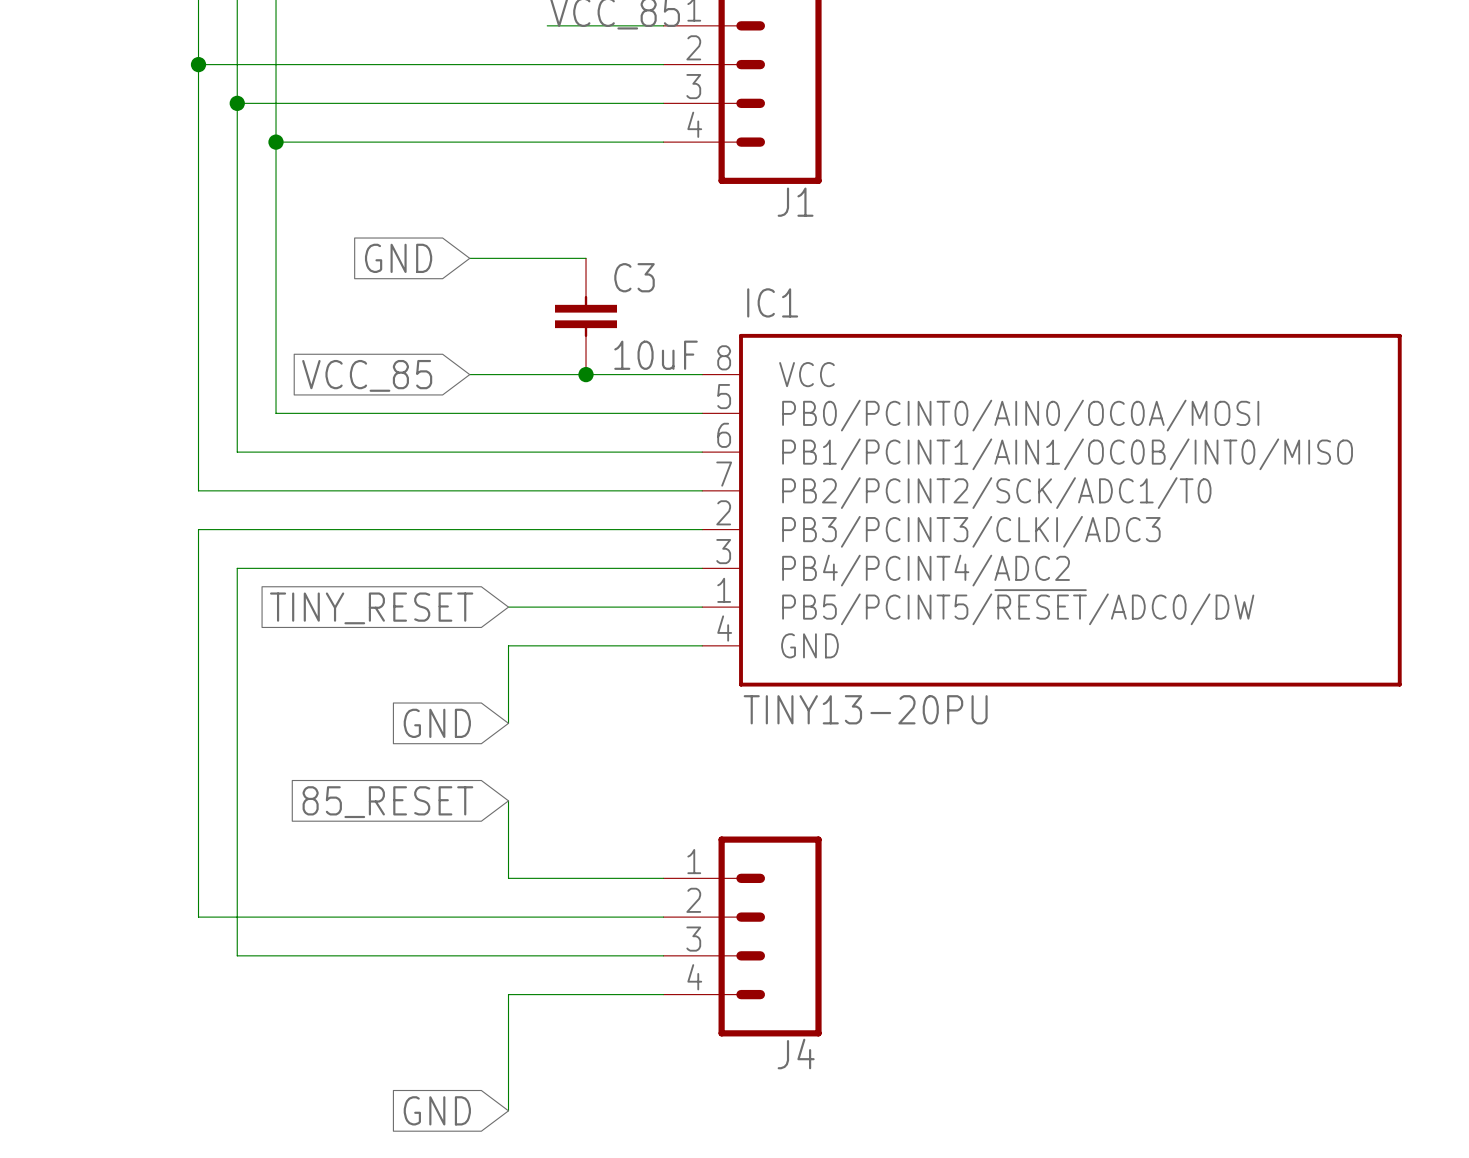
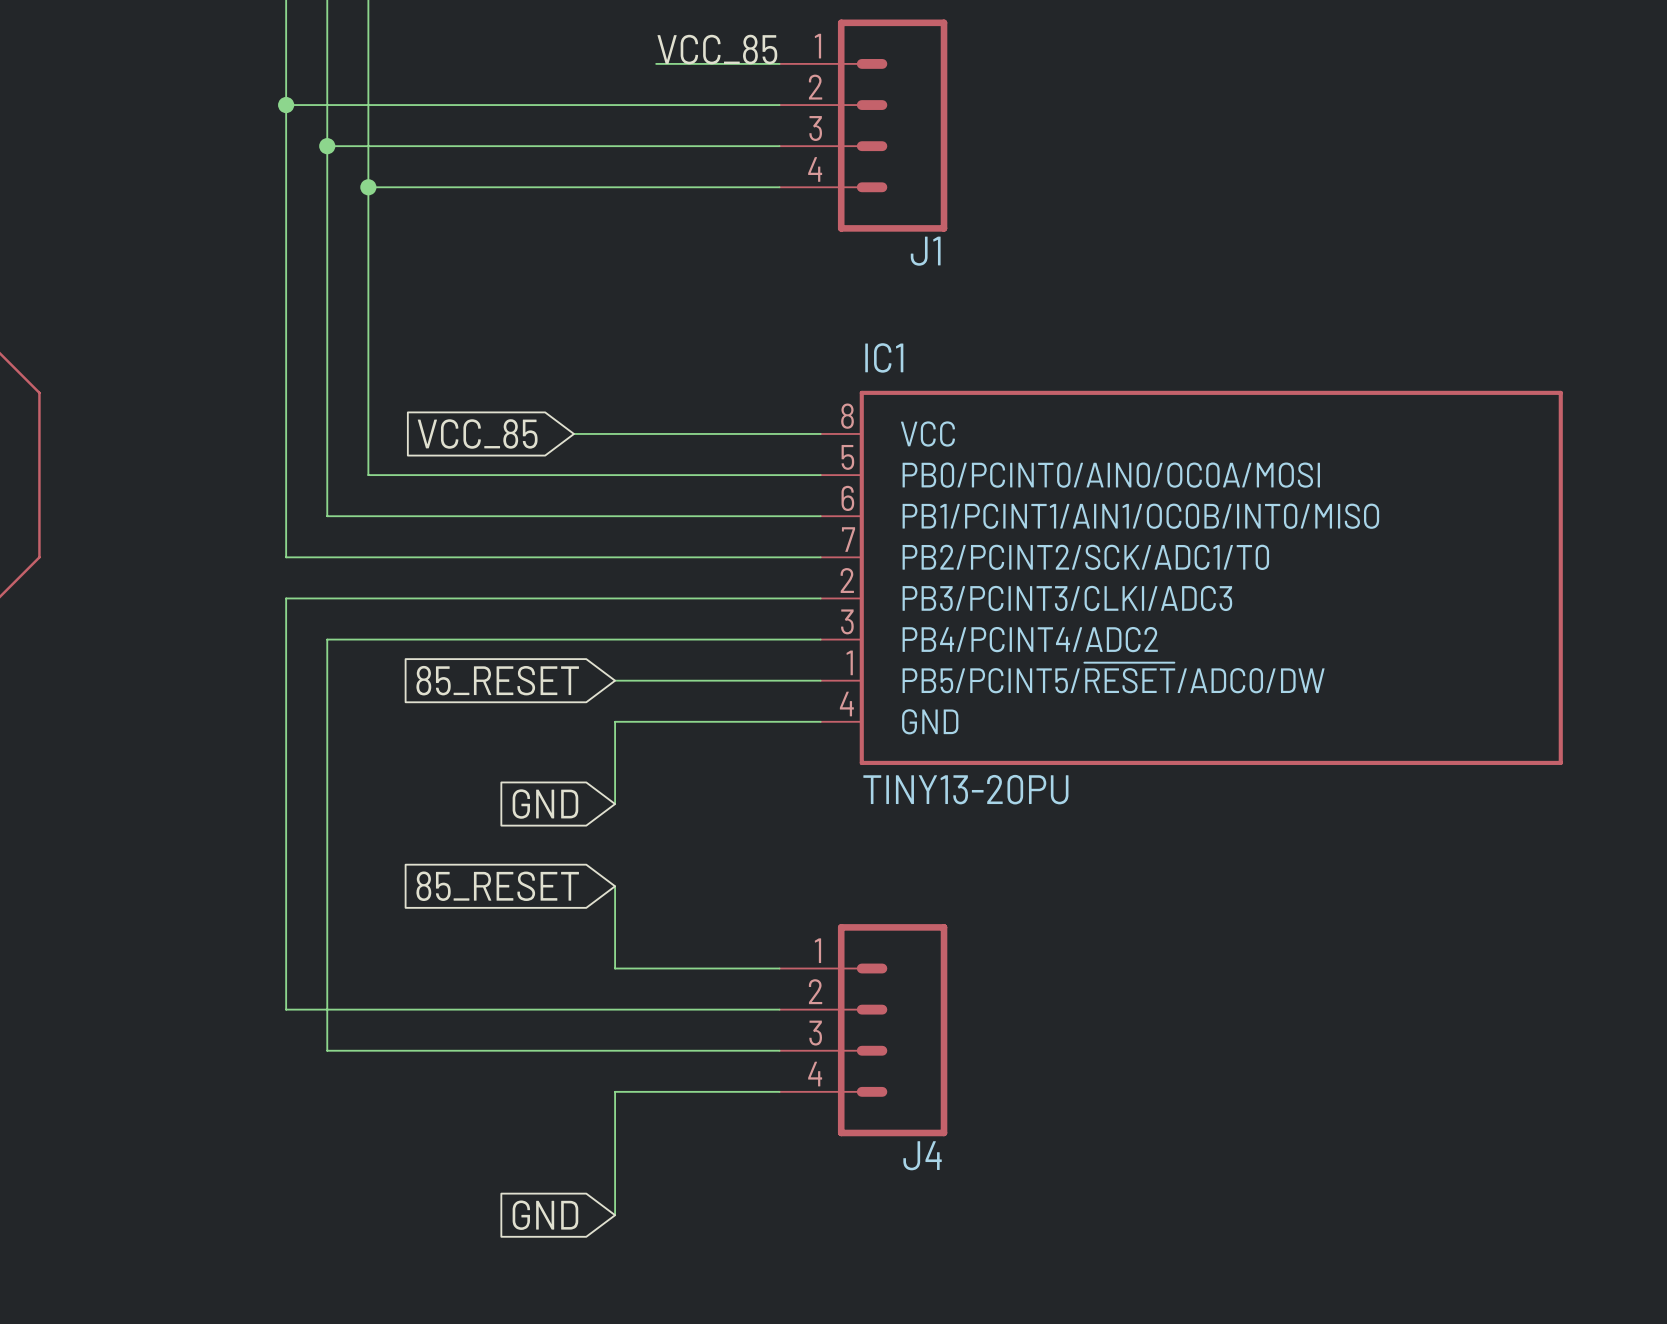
global label: GND (398, 258) -> none
wire: (469, 258) (586, 258) -> none
C3: 10uF (586, 316) -> none
junction: (586, 374) -> none
global label: TINY_RESET (371, 608) -> 85_RESET (497, 680)

